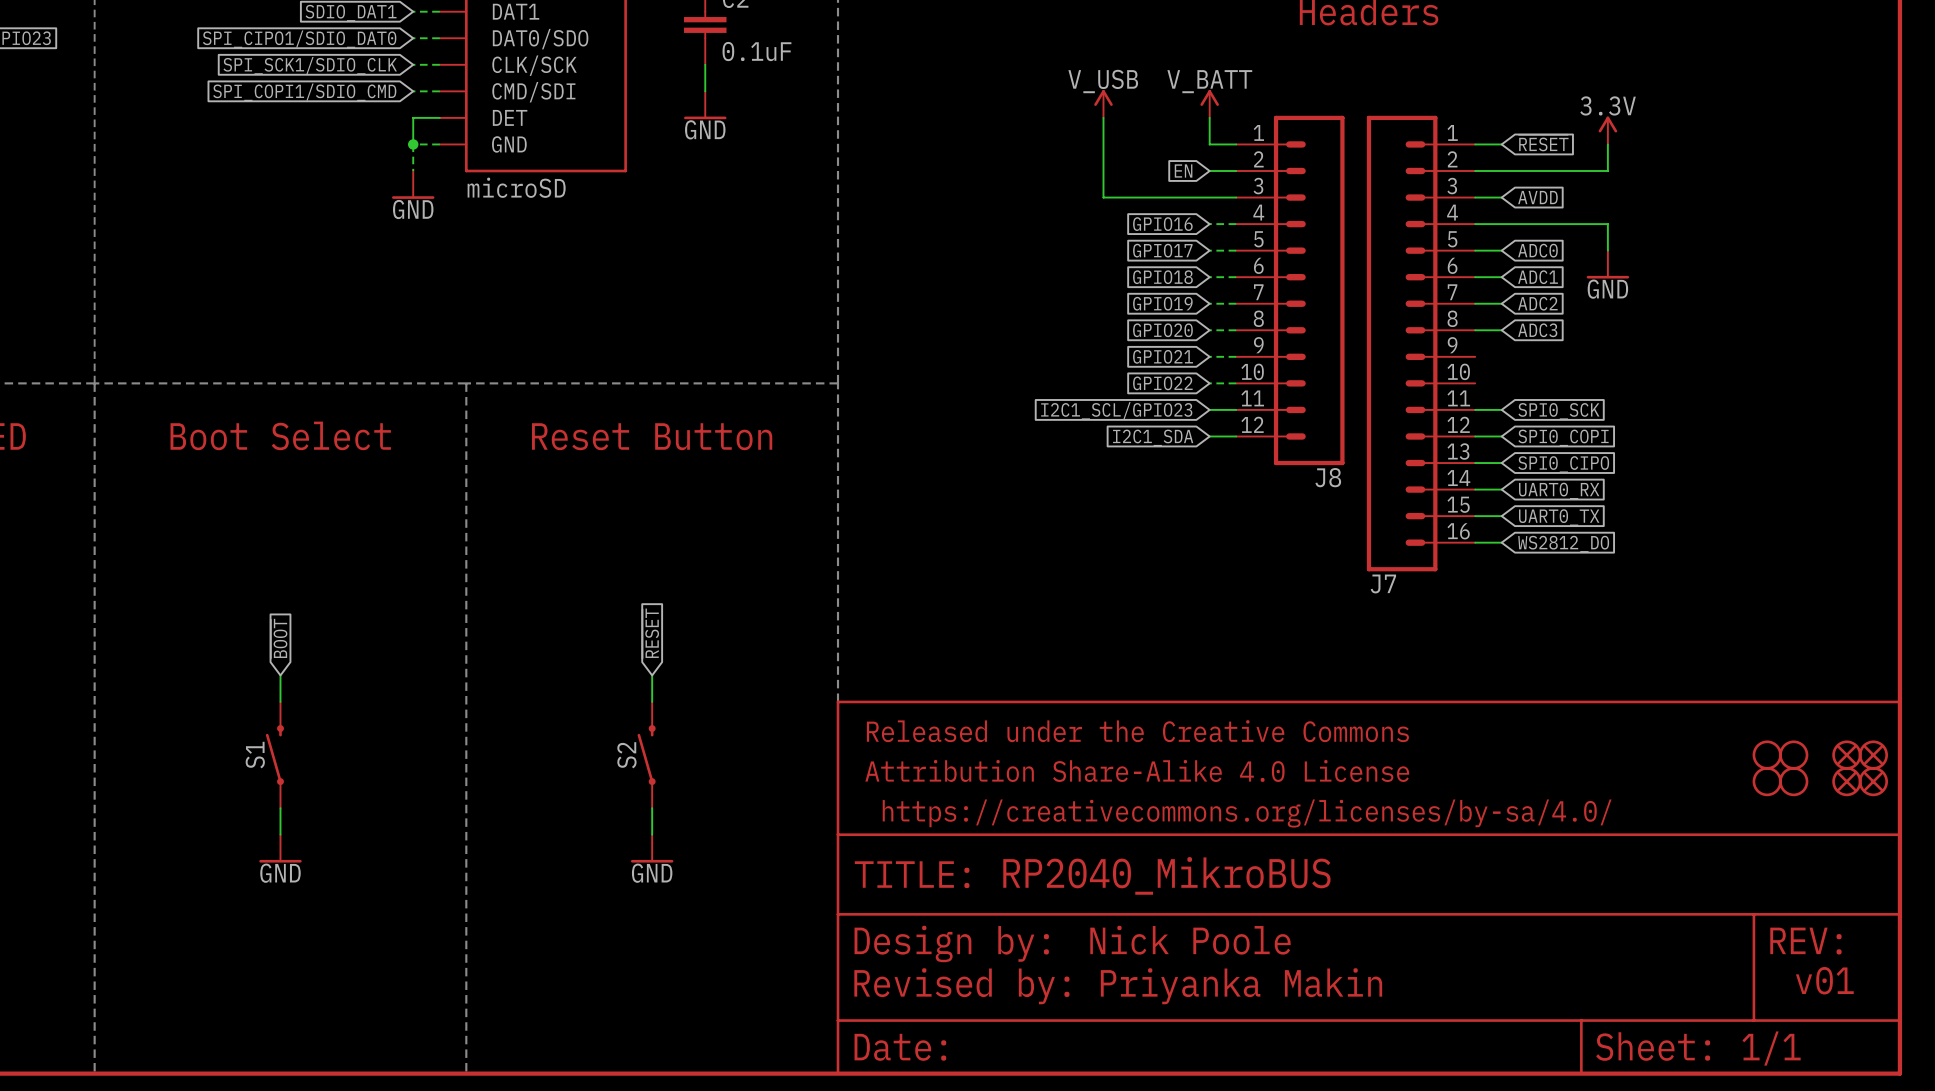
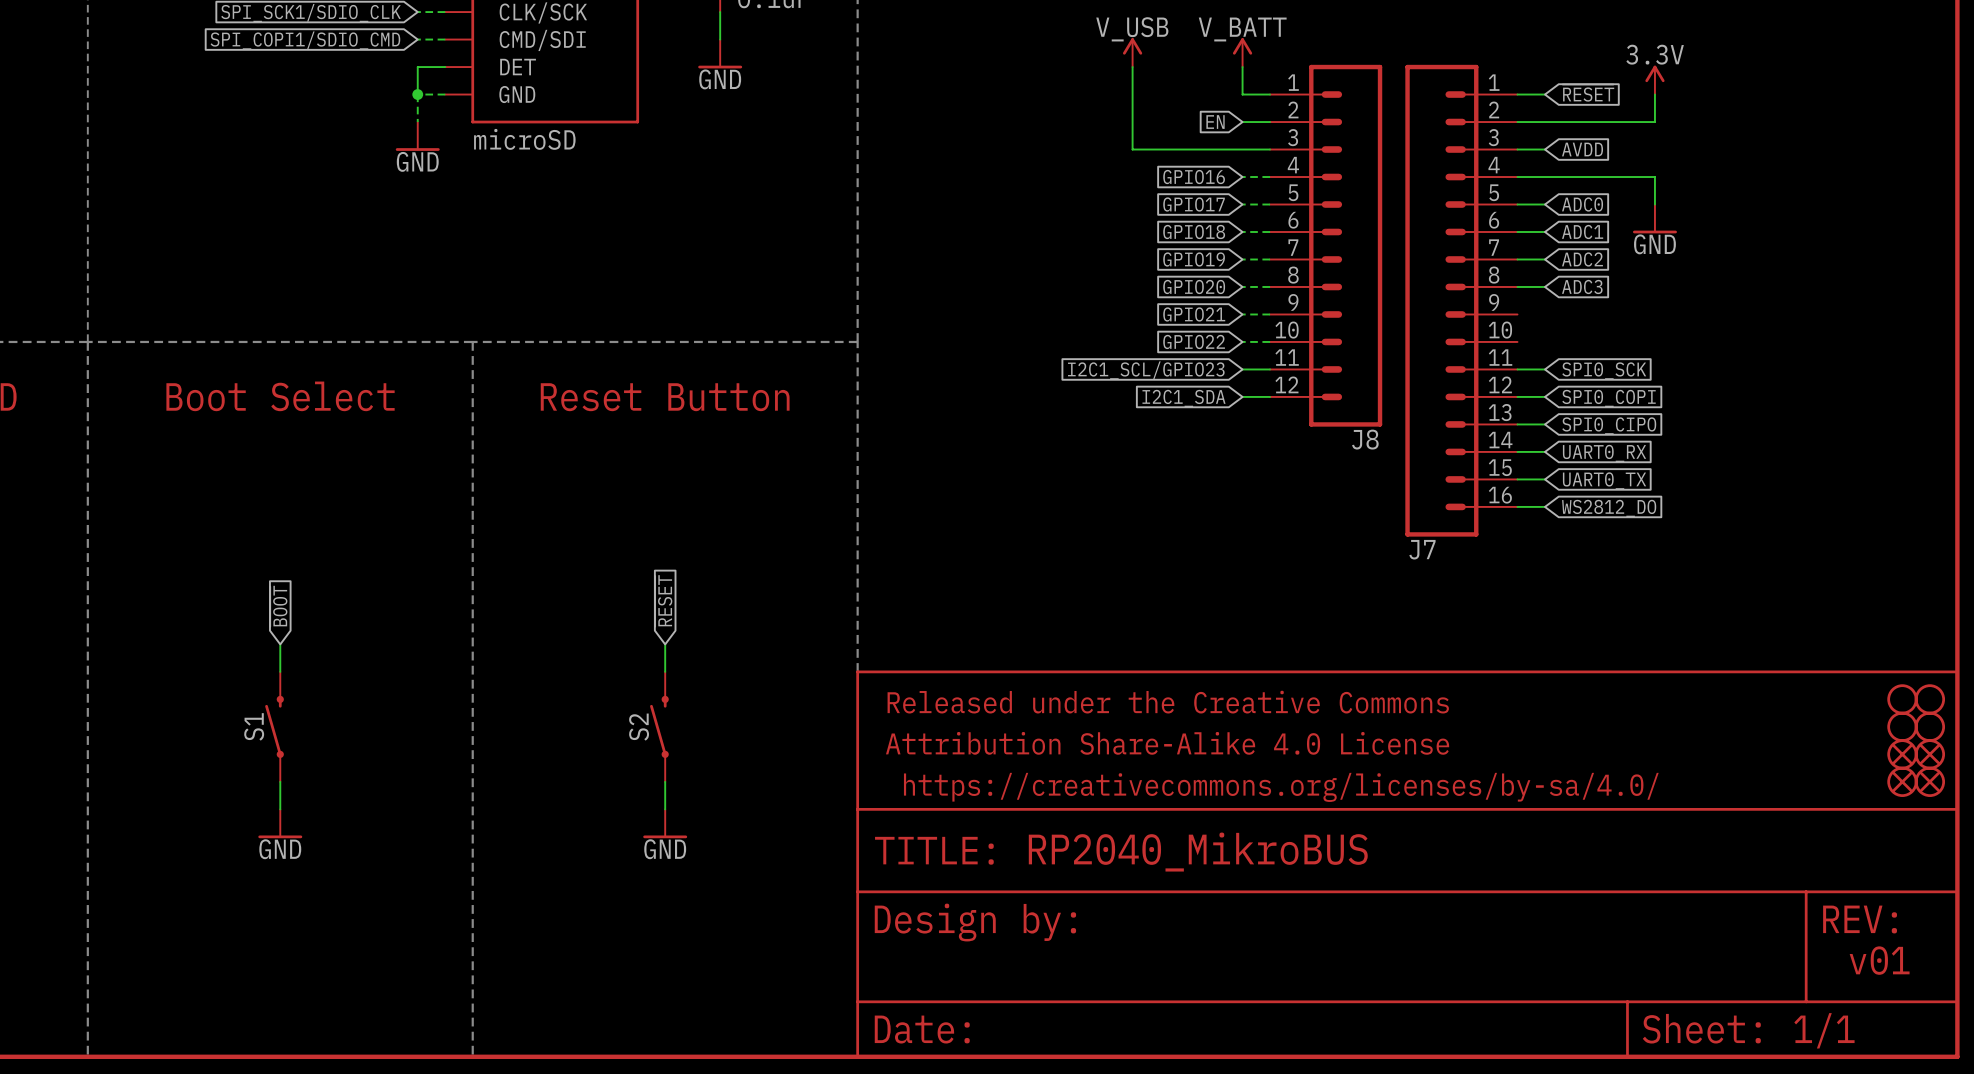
part: none -> (1902, 699)
part: none -> (1929, 699)
part symbol: [1832, 740, 1862, 770] -> [1887, 711, 1918, 743]
part symbol: [1858, 740, 1888, 770] -> [1914, 711, 1946, 743]
part: (1767, 755) -> none
part: (1793, 755) -> none
part: (1767, 781) -> none
part: (1793, 781) -> none
part: none -> (1902, 781)
part: none -> (1929, 781)
text: Nick Poole (1190, 940) -> none
text: Revised by: Priyanka Makin (1118, 986) -> none

